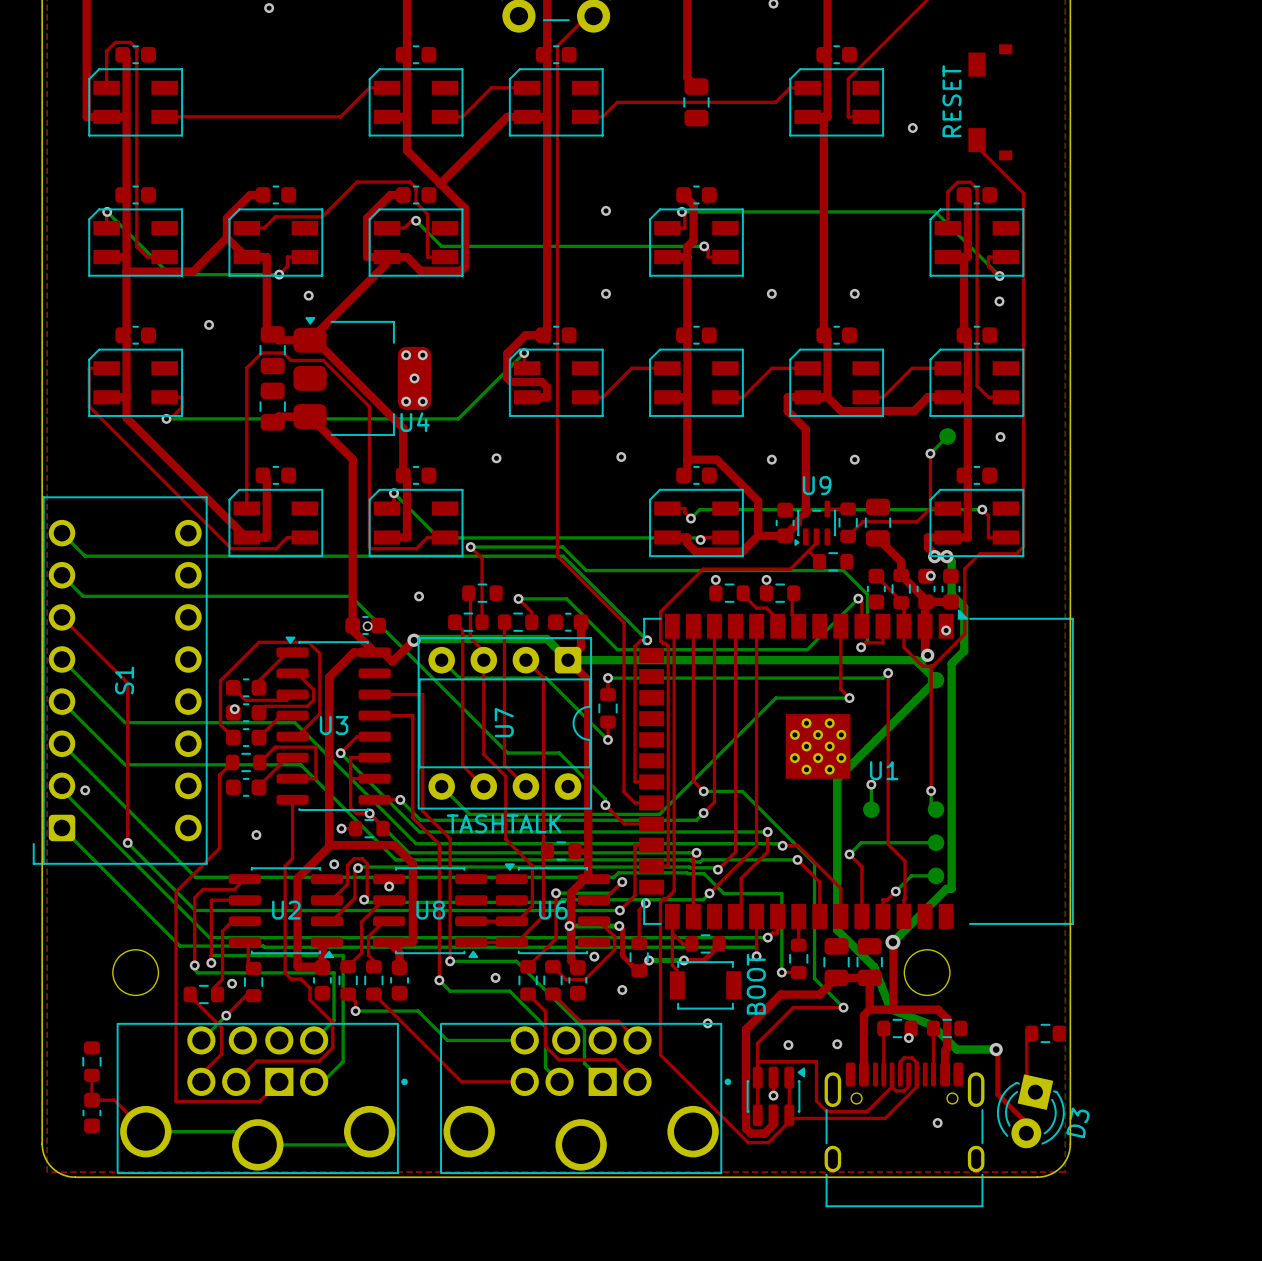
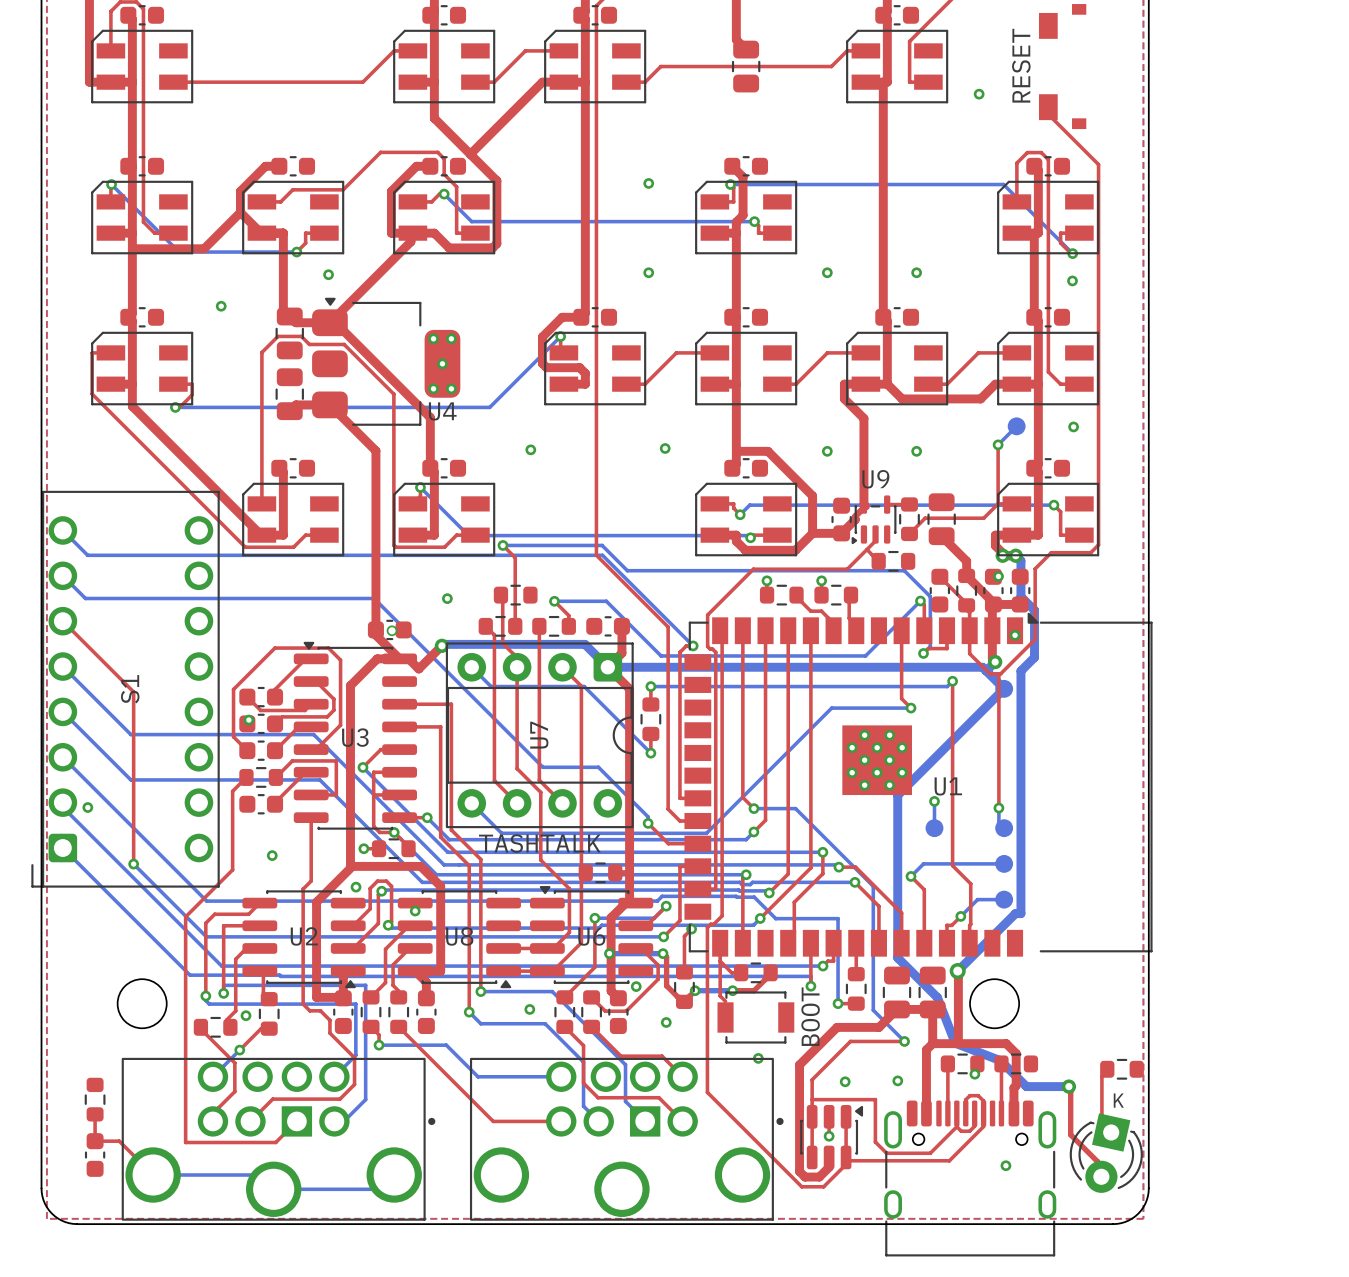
text: none -> K (1118, 1100)
D3 name: D3 (1077, 1122) -> none

